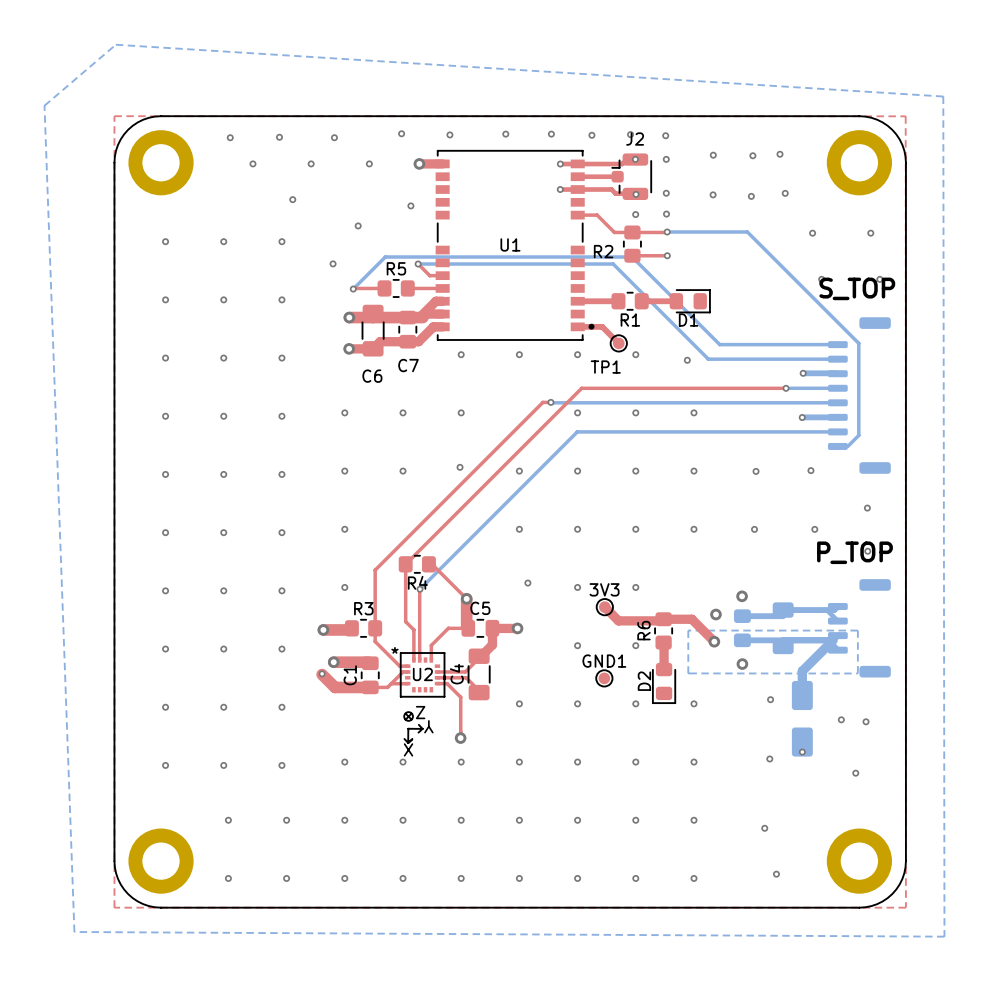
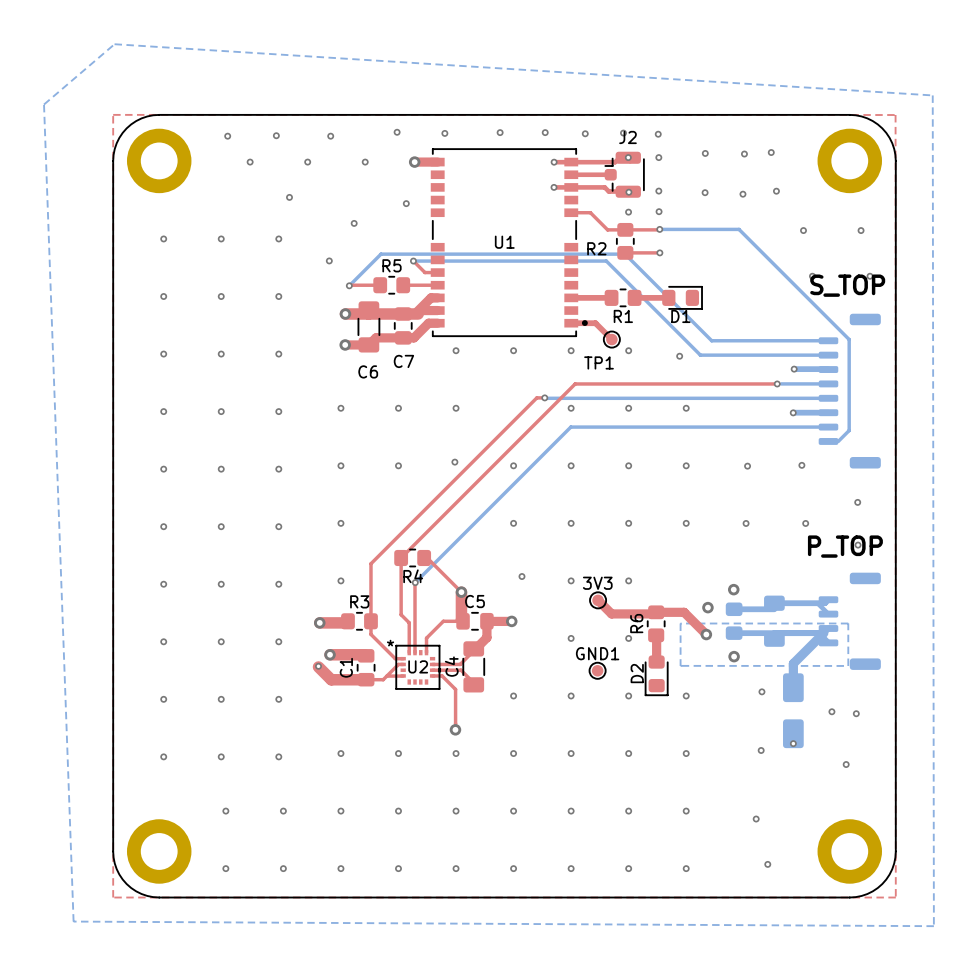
drawing: [403, 711, 414, 722] -> none
text: Z (420, 712) -> none
line: (405, 713) (411, 719) -> none
line: (411, 713) (405, 719) -> none
line: (418, 724) (422, 728) -> none
text: Y (428, 726) -> none
line: (408, 728) (408, 743) -> none
line: (408, 728) (422, 728) -> none
line: (422, 728) (418, 732) -> none
line: (404, 738) (408, 743) -> none
text: X (408, 749) -> none

